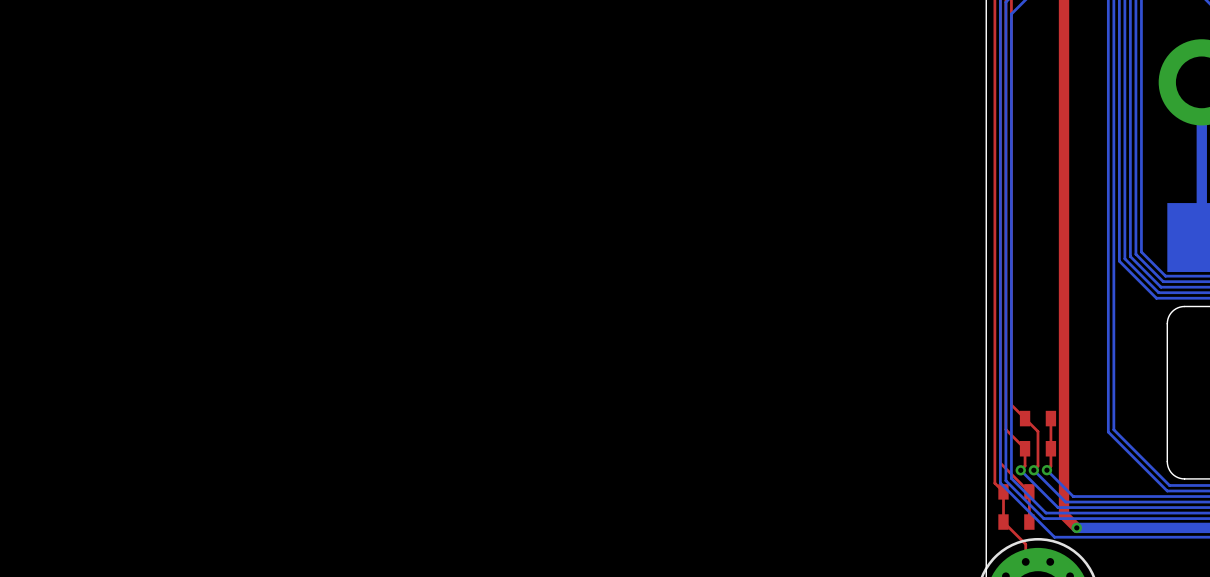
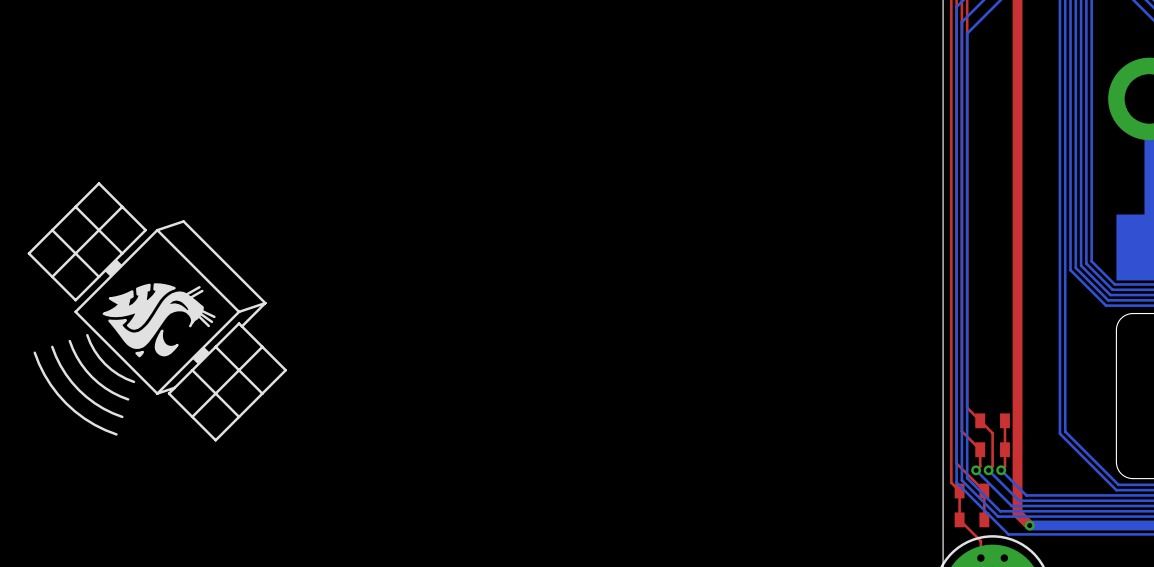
drawing: none -> [27, 182, 287, 442]

